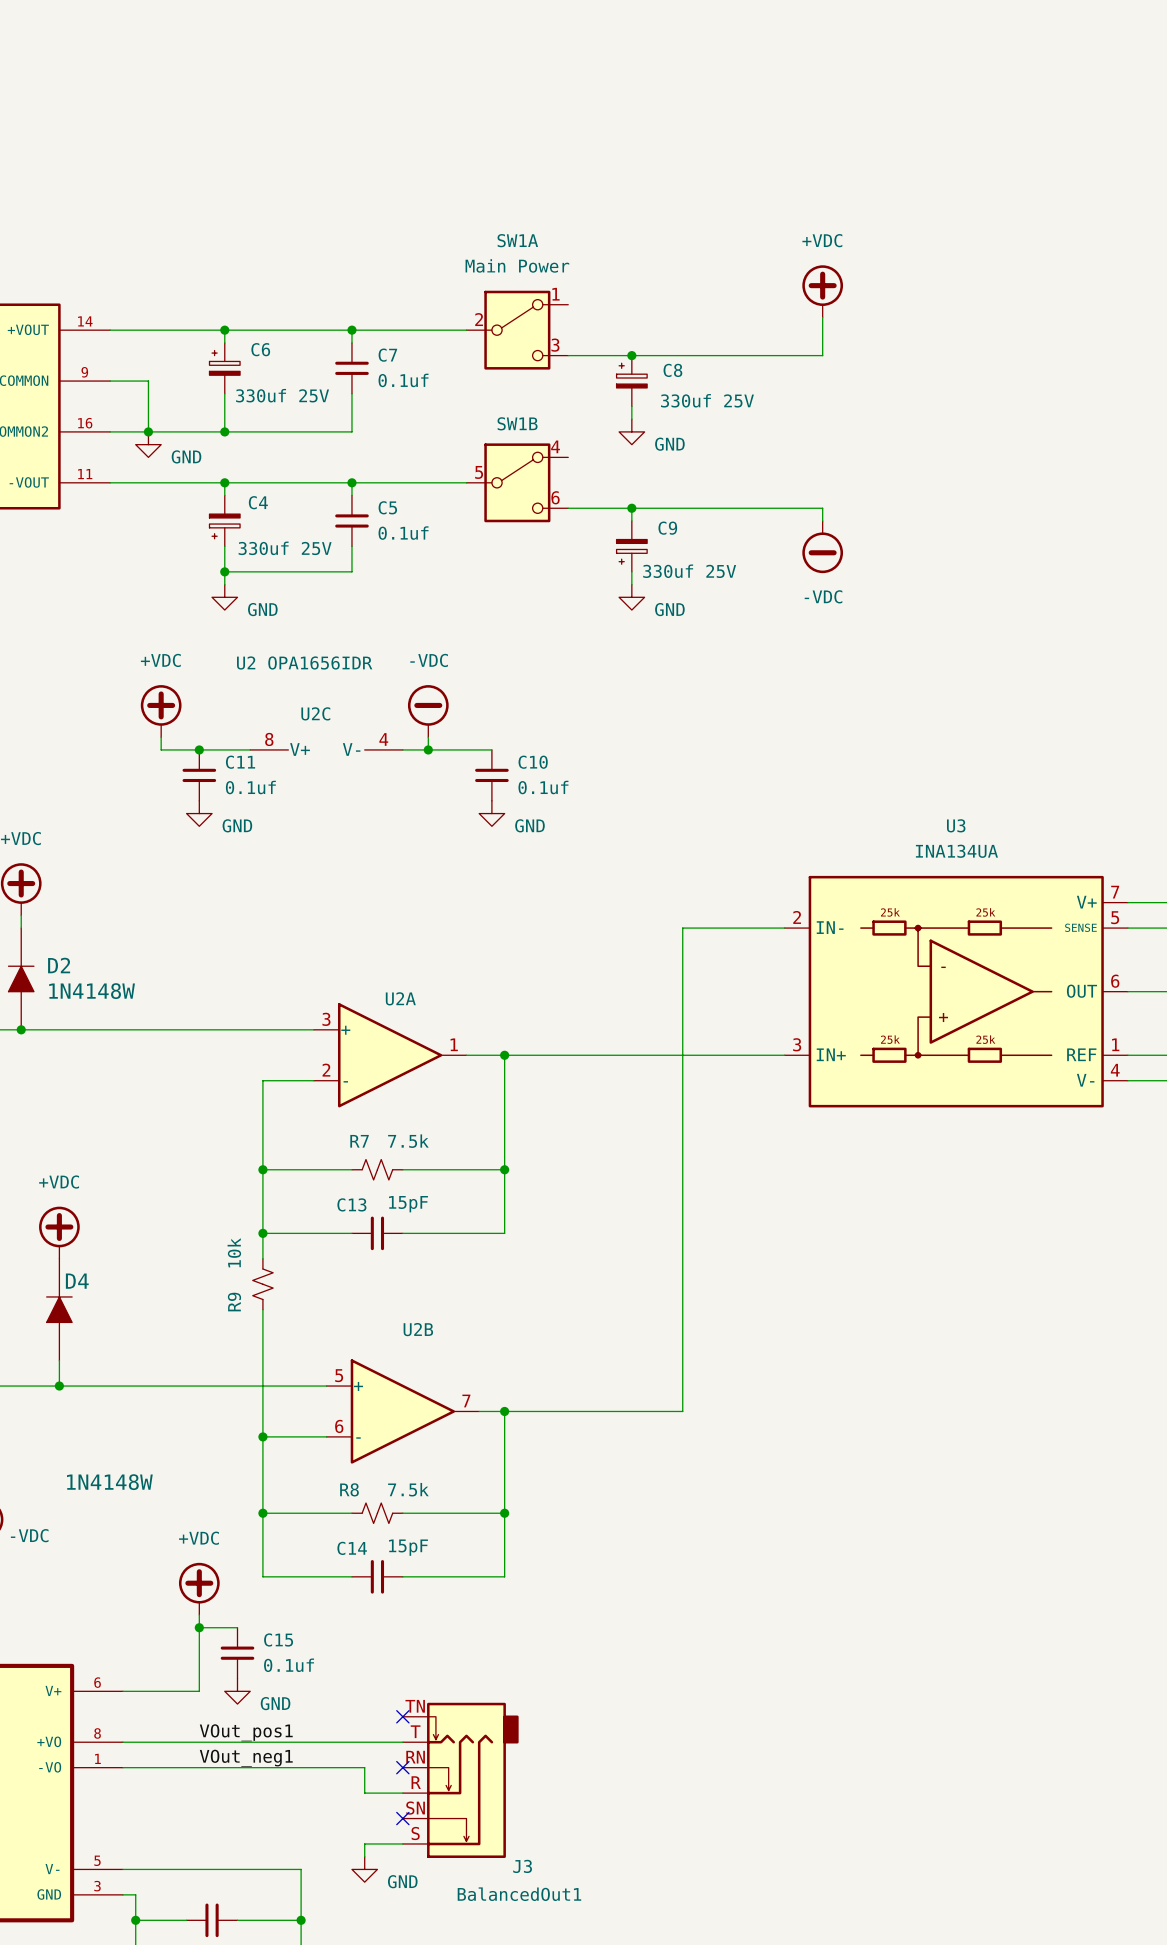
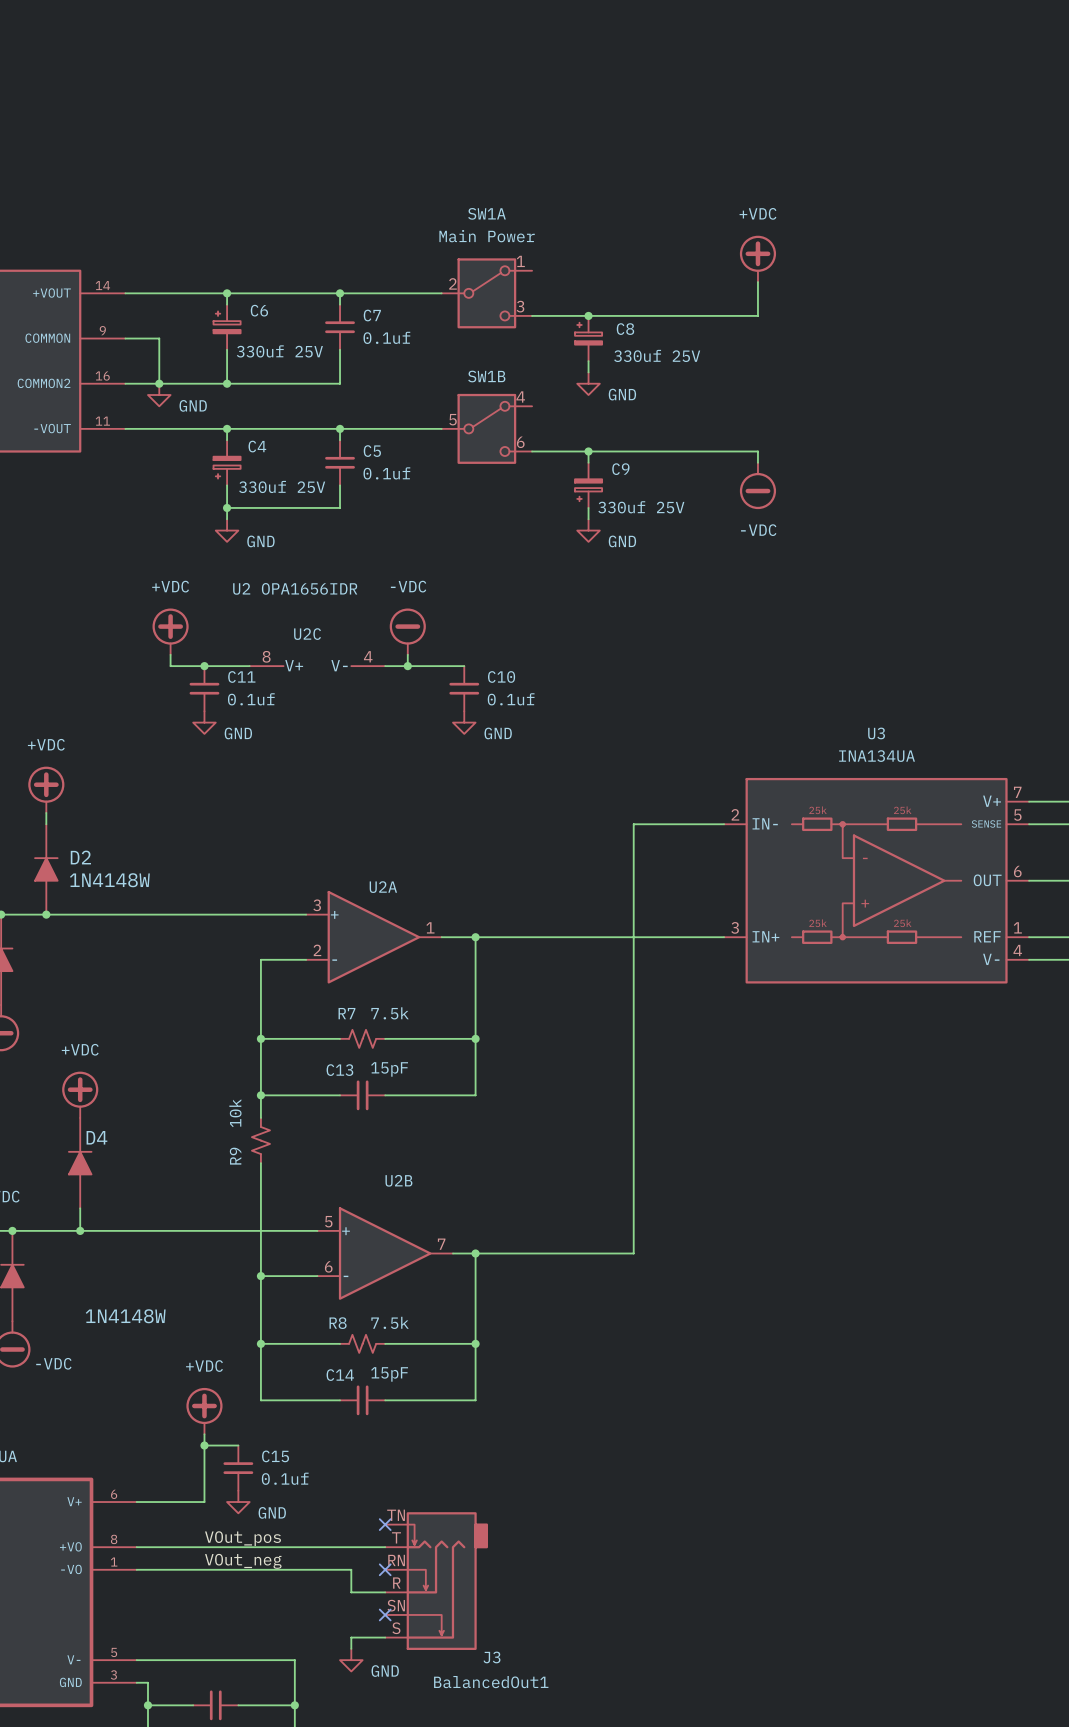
label: VOut_pos1 (246, 1732) -> VOut_pos (242, 1538)
label: VOut_neg1 (246, 1758) -> VOut_neg (243, 1561)

